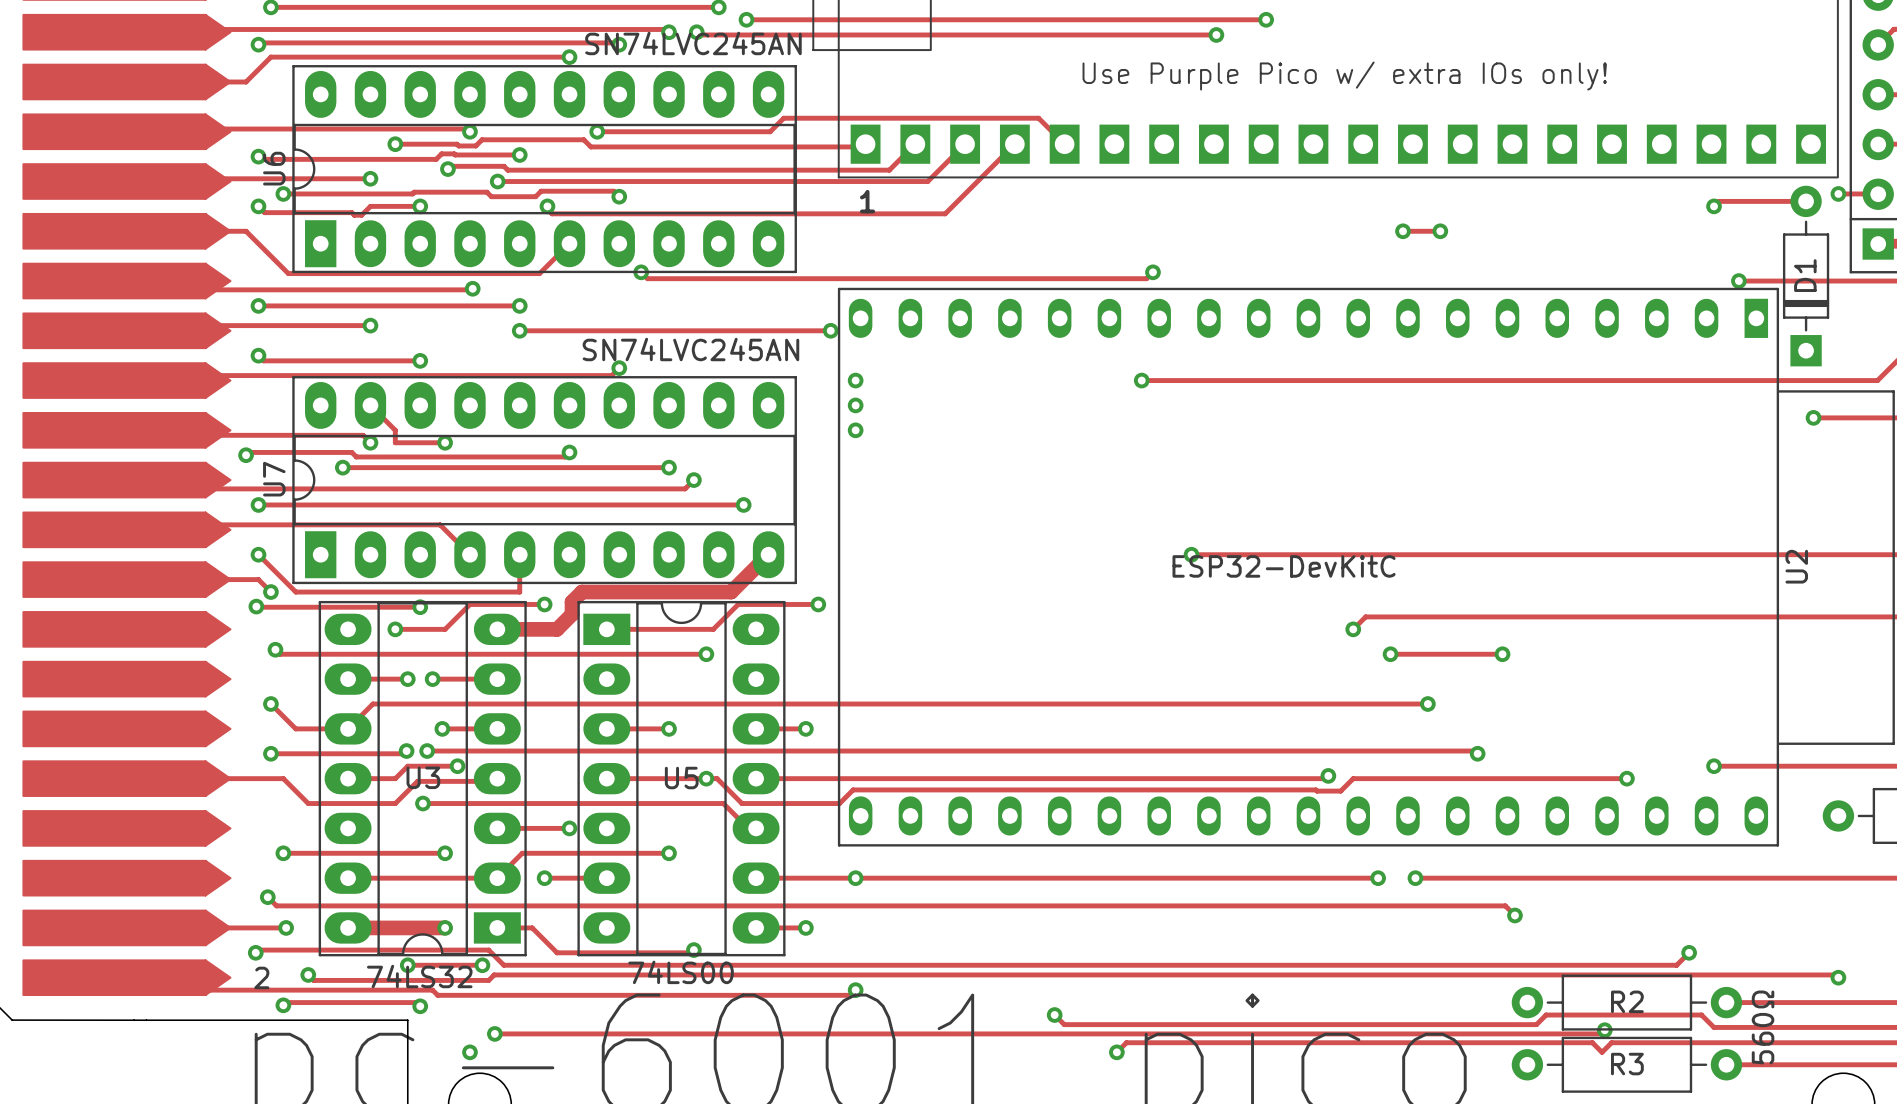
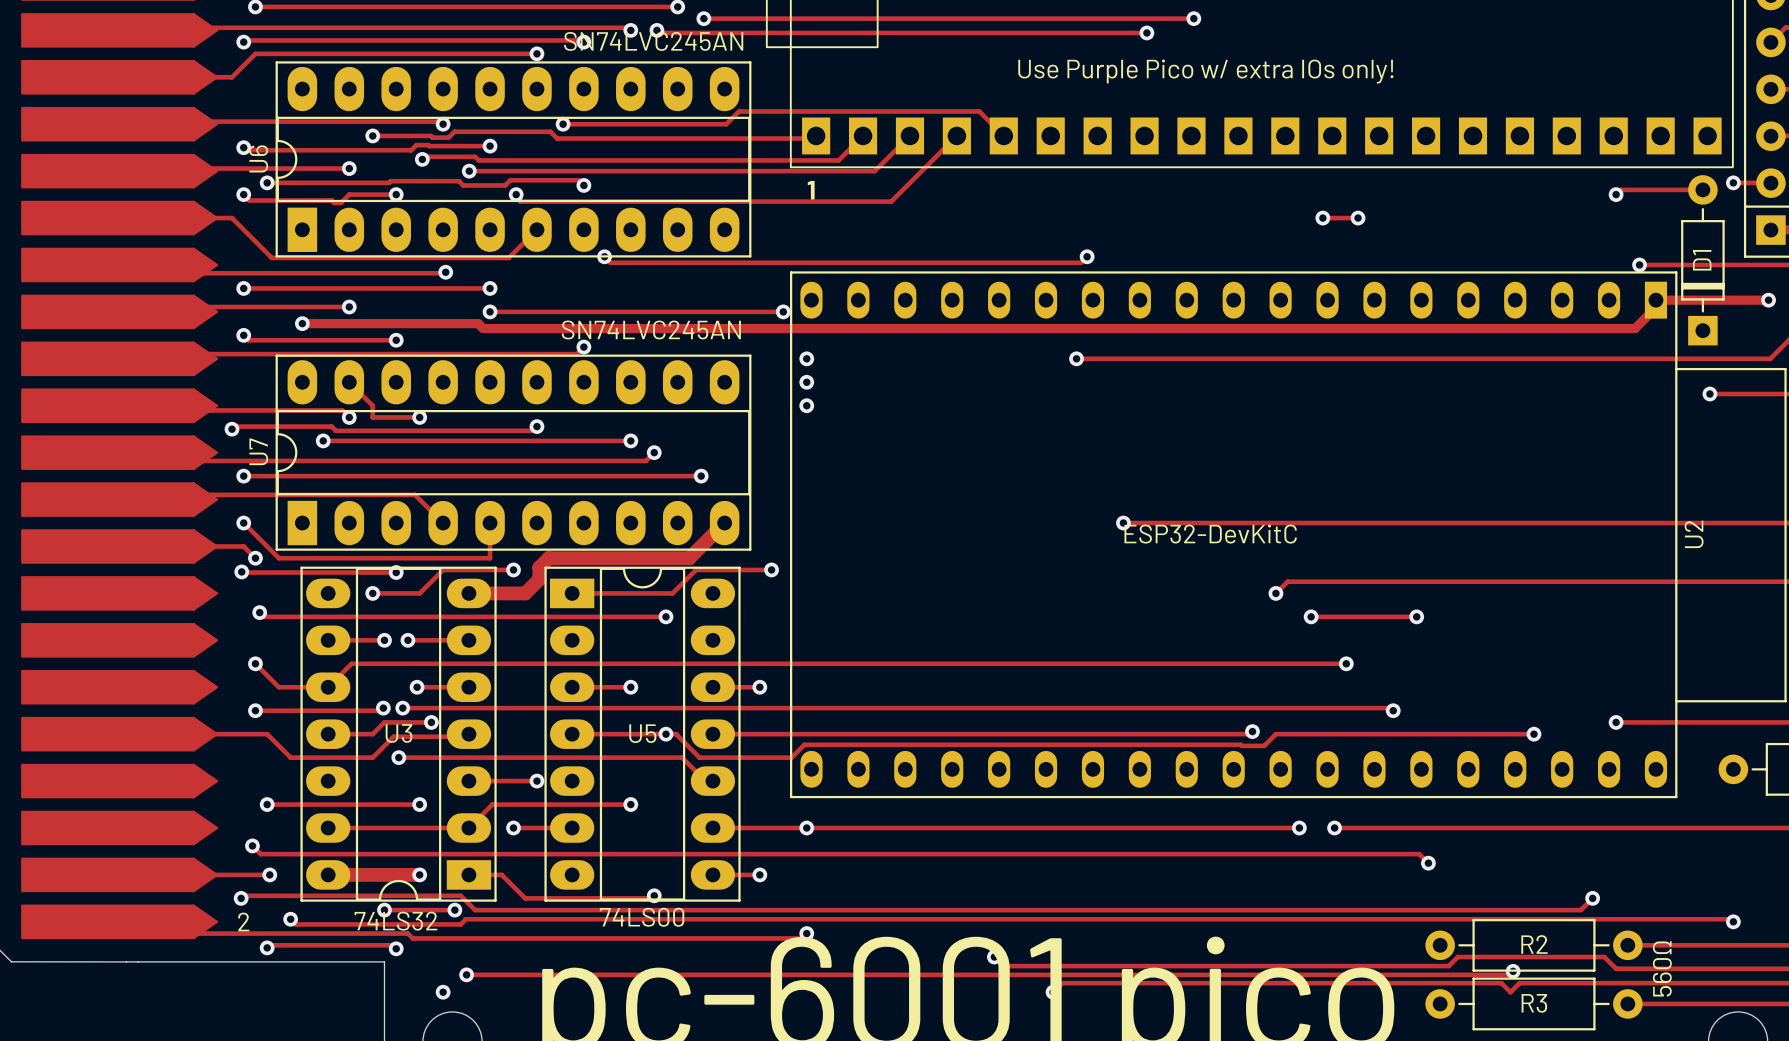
track: none -> (1768, 300) (1655, 300) (1655, 307) (1635, 328) (483, 328) (478, 323) (302, 323)
via: none -> (1768, 300)
via: none -> (302, 323)

